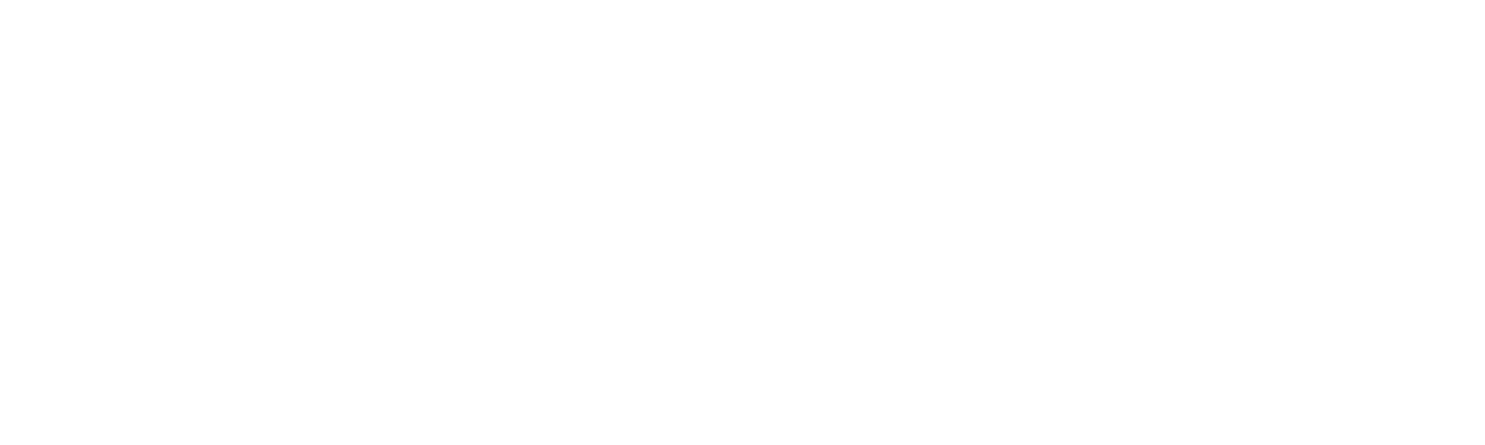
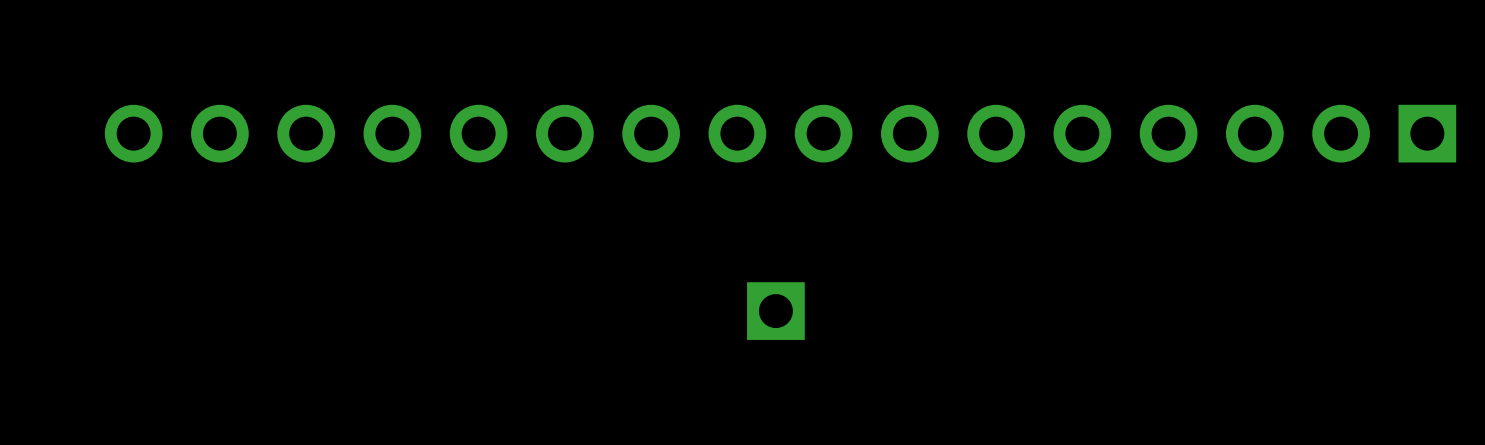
part: none -> (780, 133)
part: none -> (775, 311)

